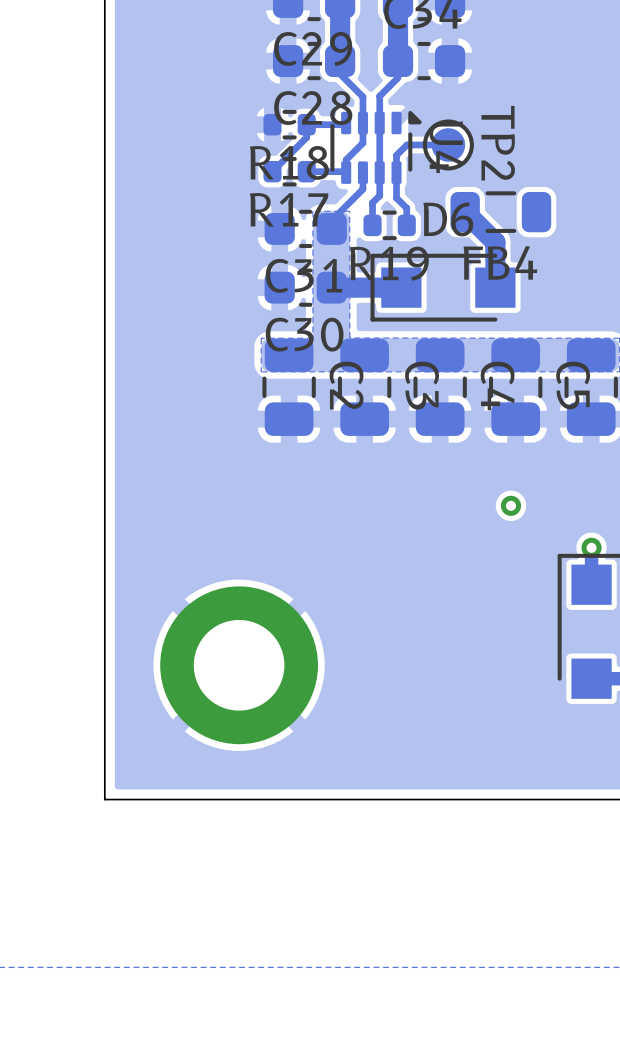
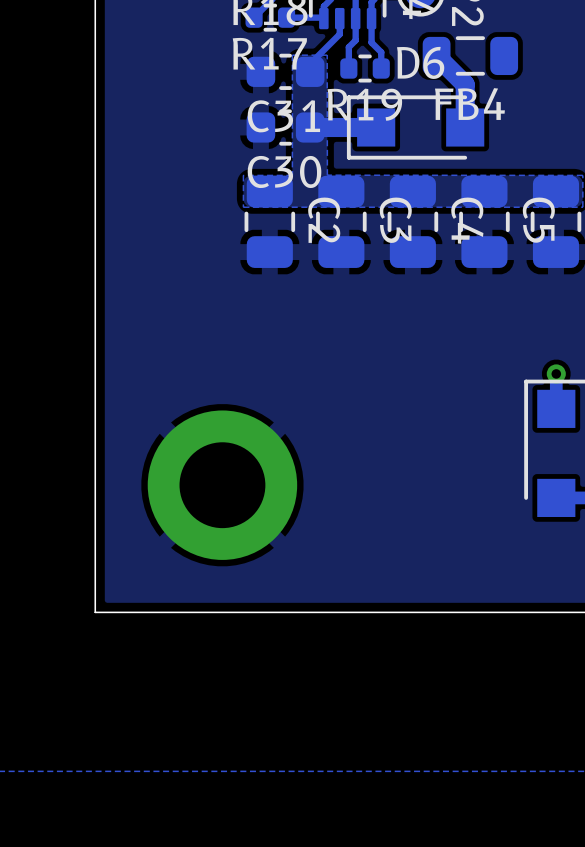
via: (510, 505) -> none

